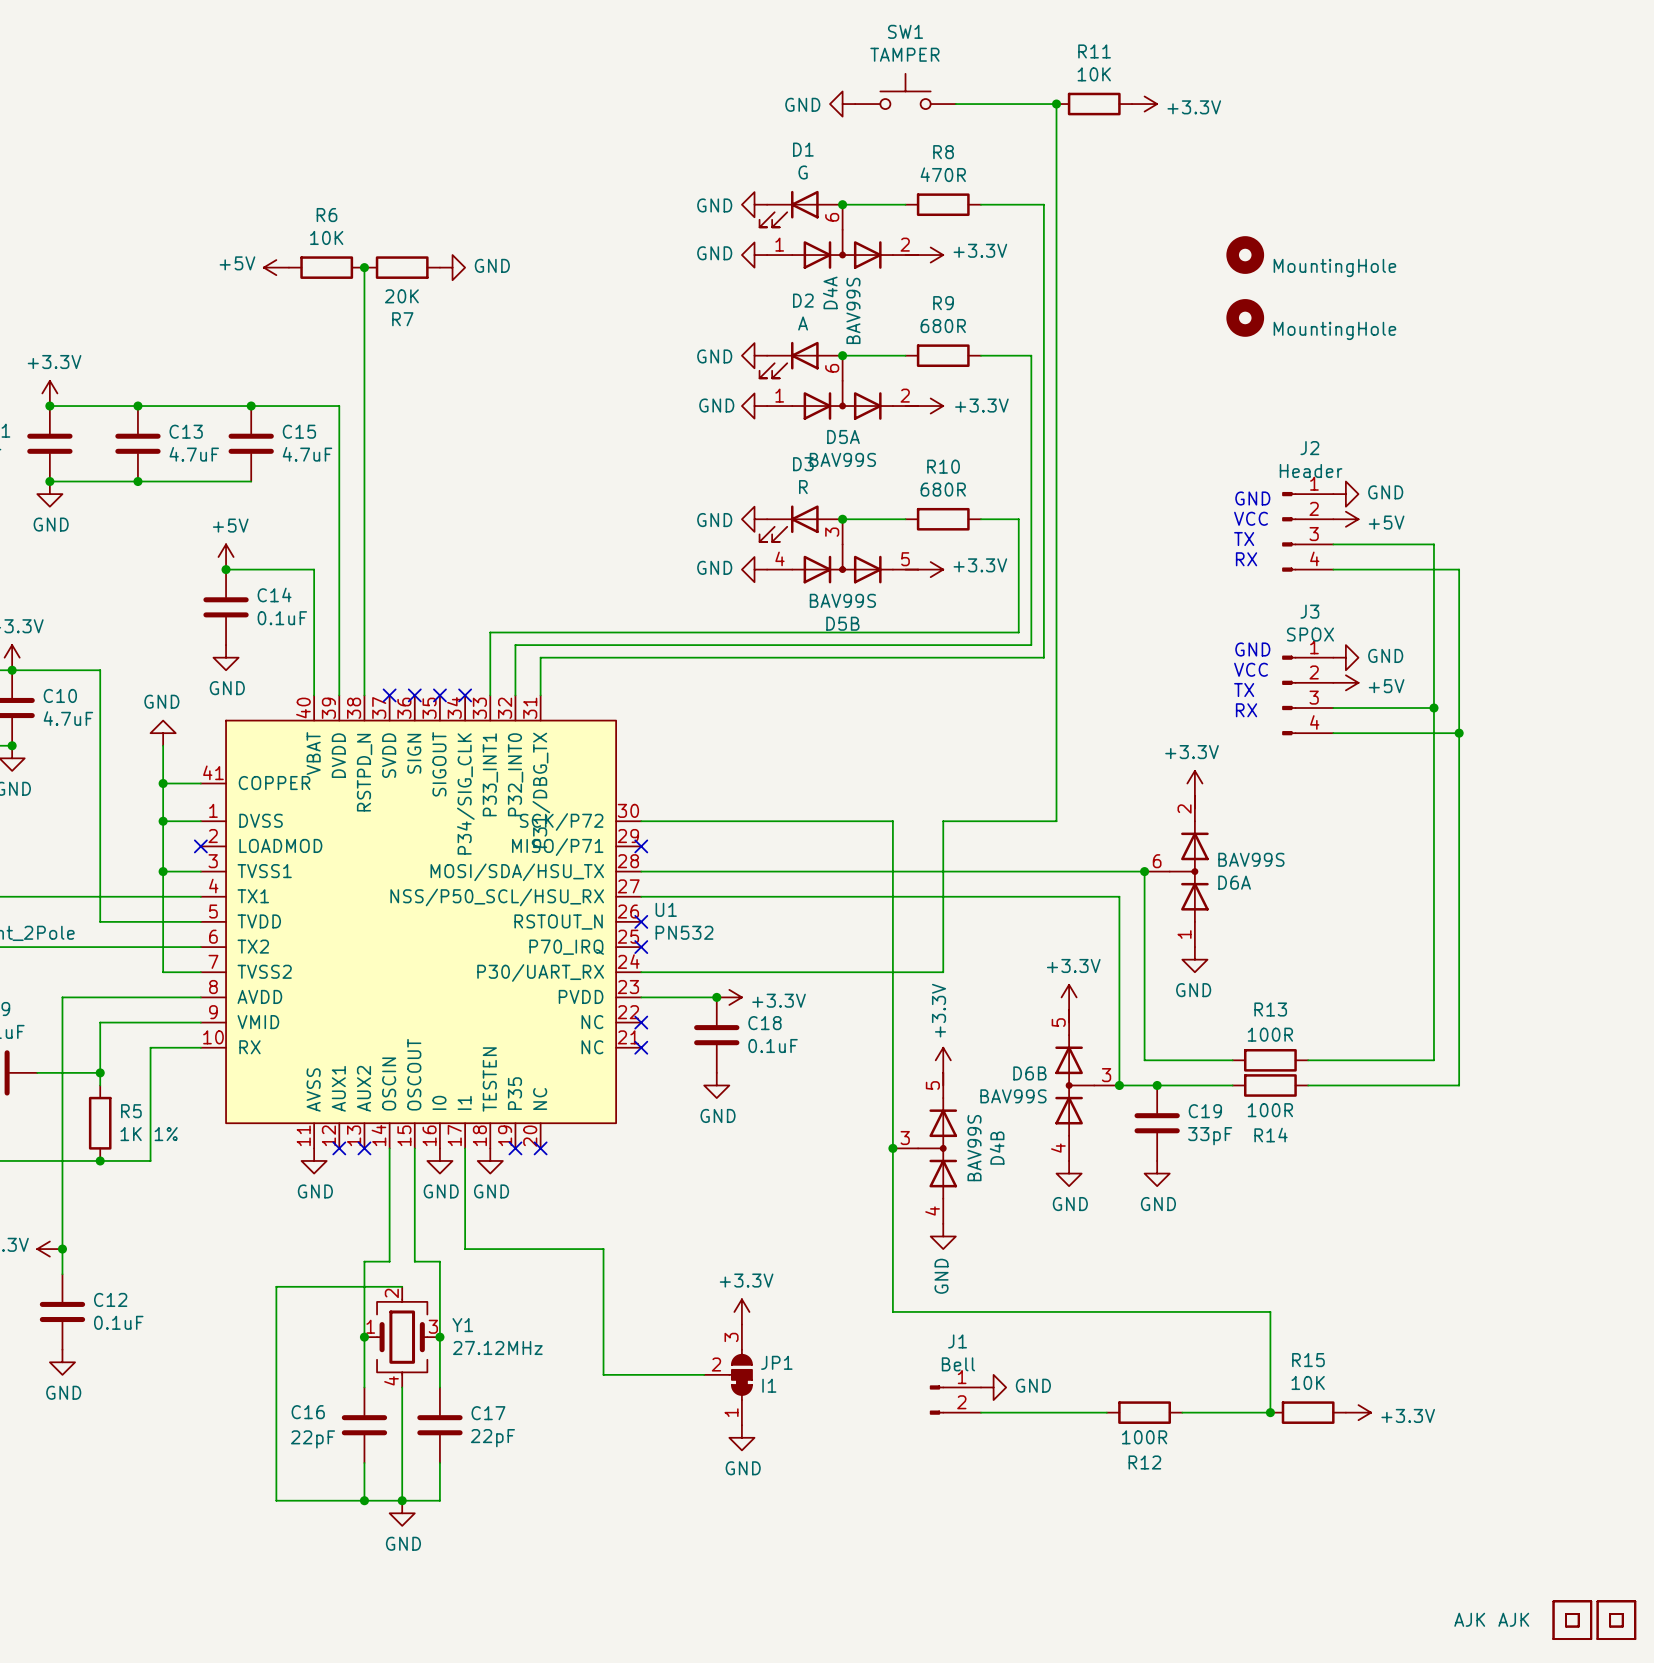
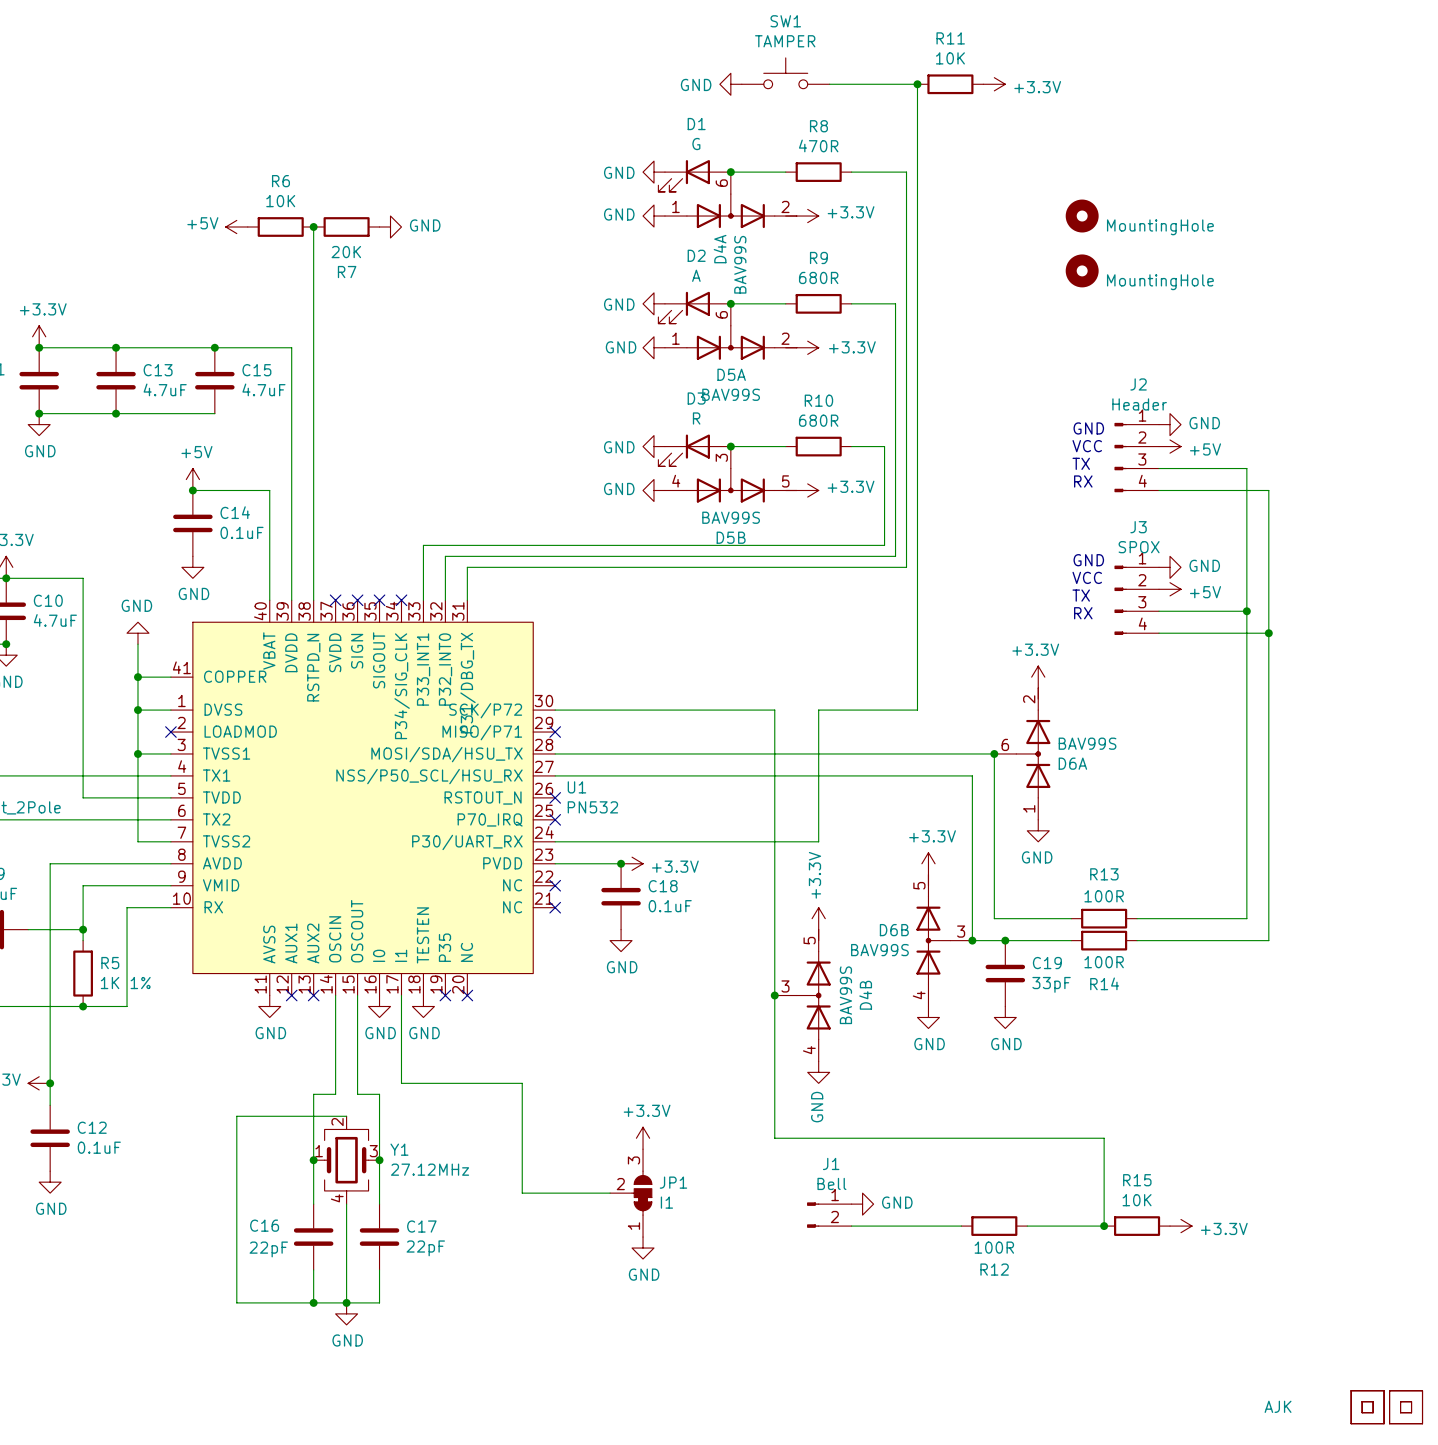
part: AJK (1513, 1619) -> none

